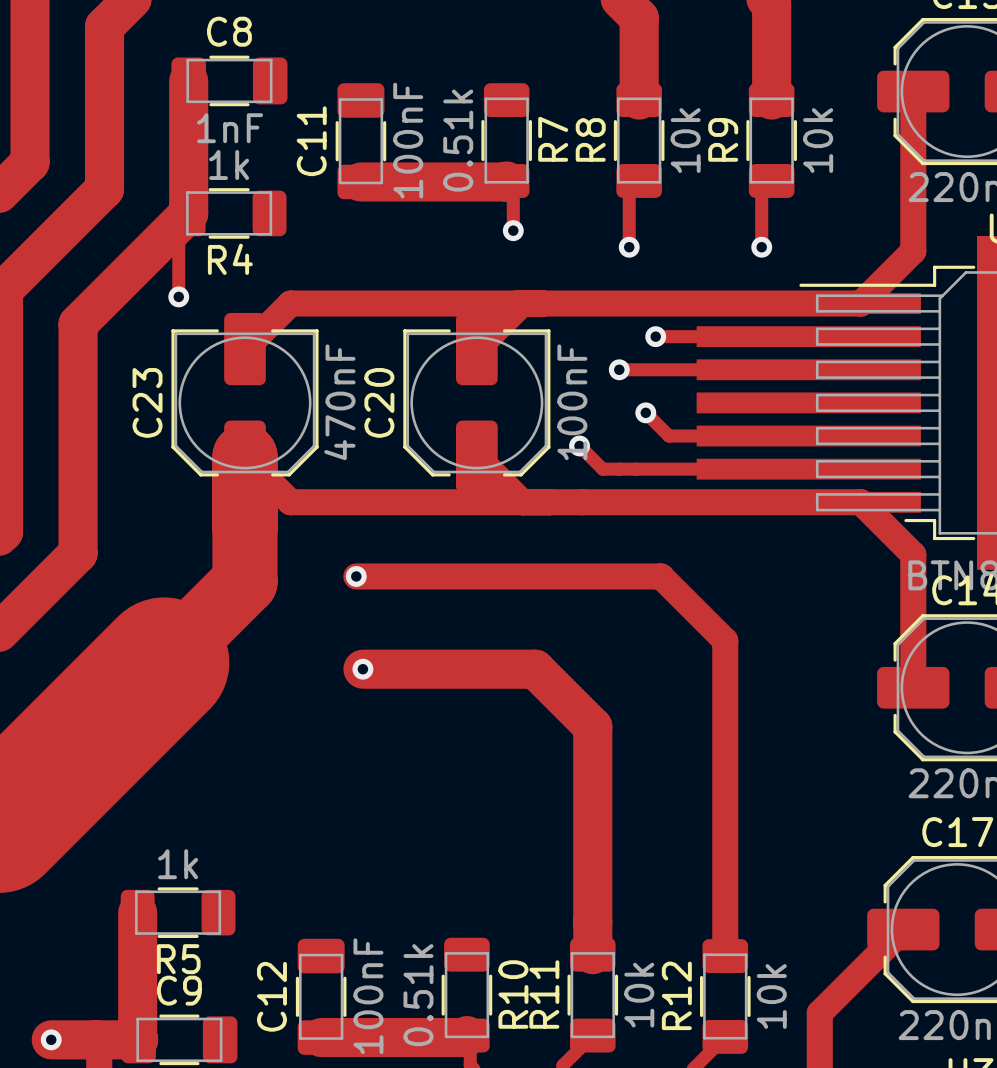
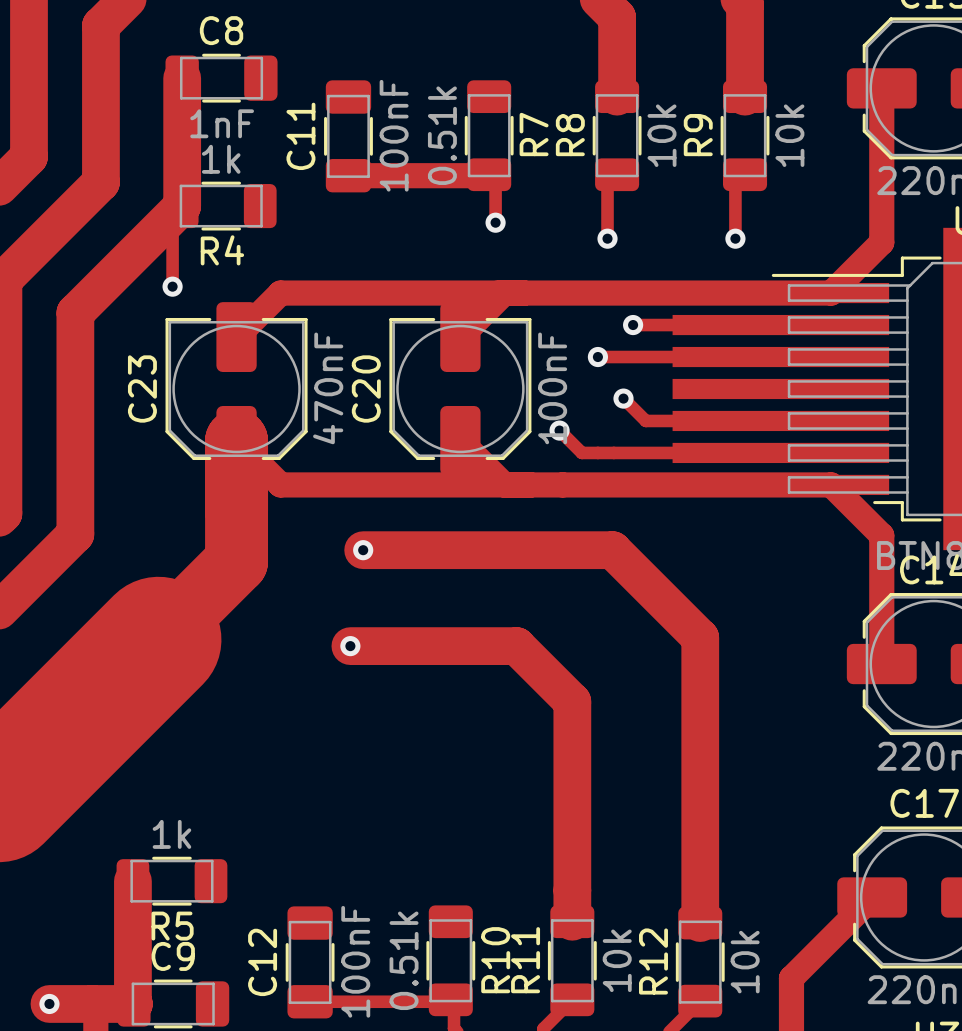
track width: thick (506, 180) (360, 181) -> thin (489, 174) (348, 175)
track: (356, 576) (661, 576) (725, 640) (725, 660) -> (363, 550) (612, 550) (700, 637)
via position: (356, 576) -> (363, 550)
track width: thin (725, 660) (725, 956) -> thick (700, 637) (700, 923)
track width: thick (466, 1035) (464, 1037) (321, 1037) -> thin (450, 999) (448, 1001) (310, 1001)

